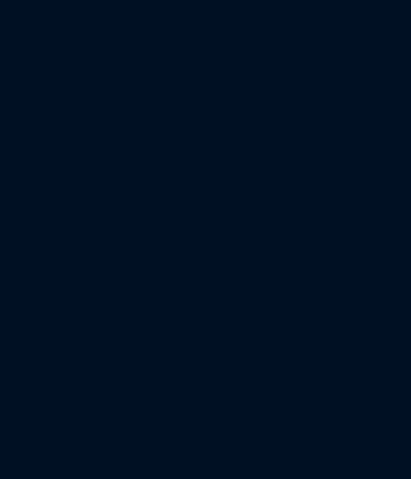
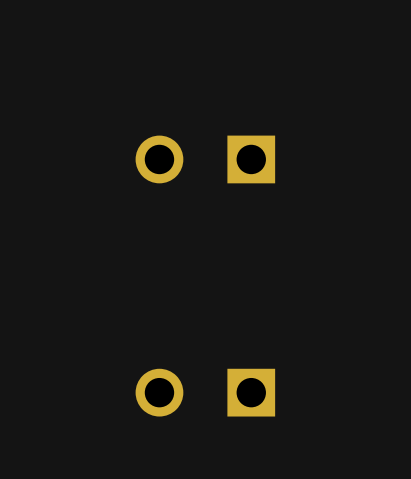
part: none -> (205, 159)
part: none -> (205, 392)

